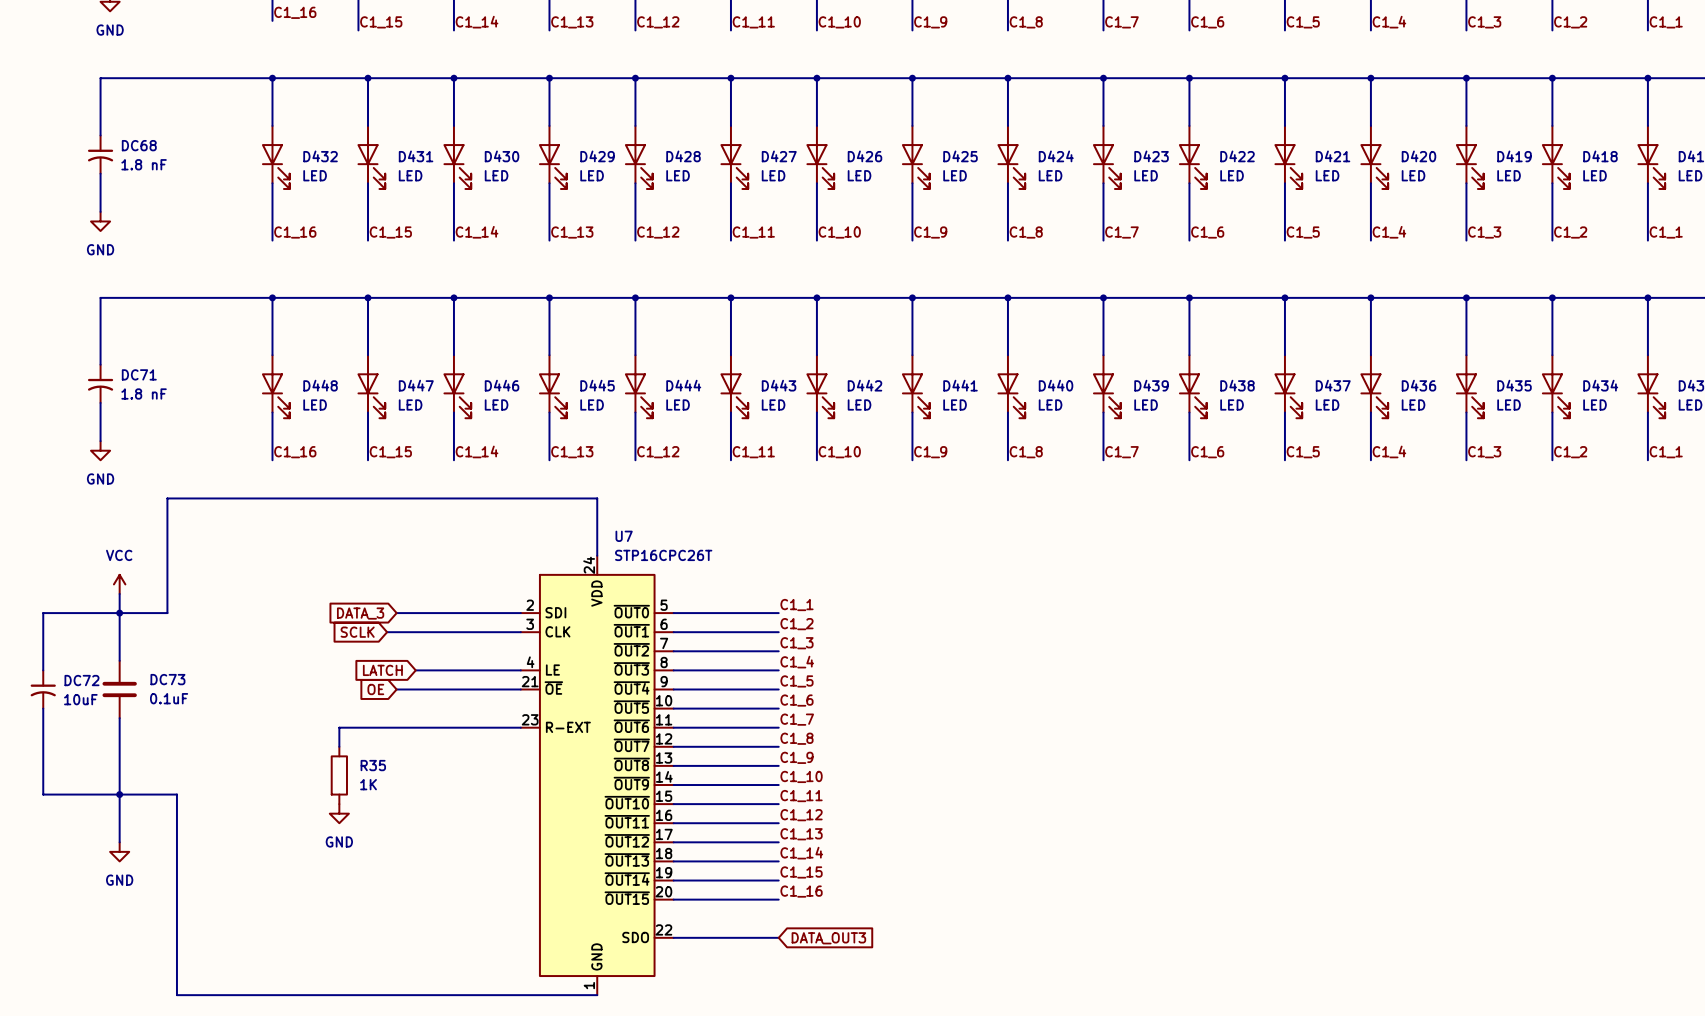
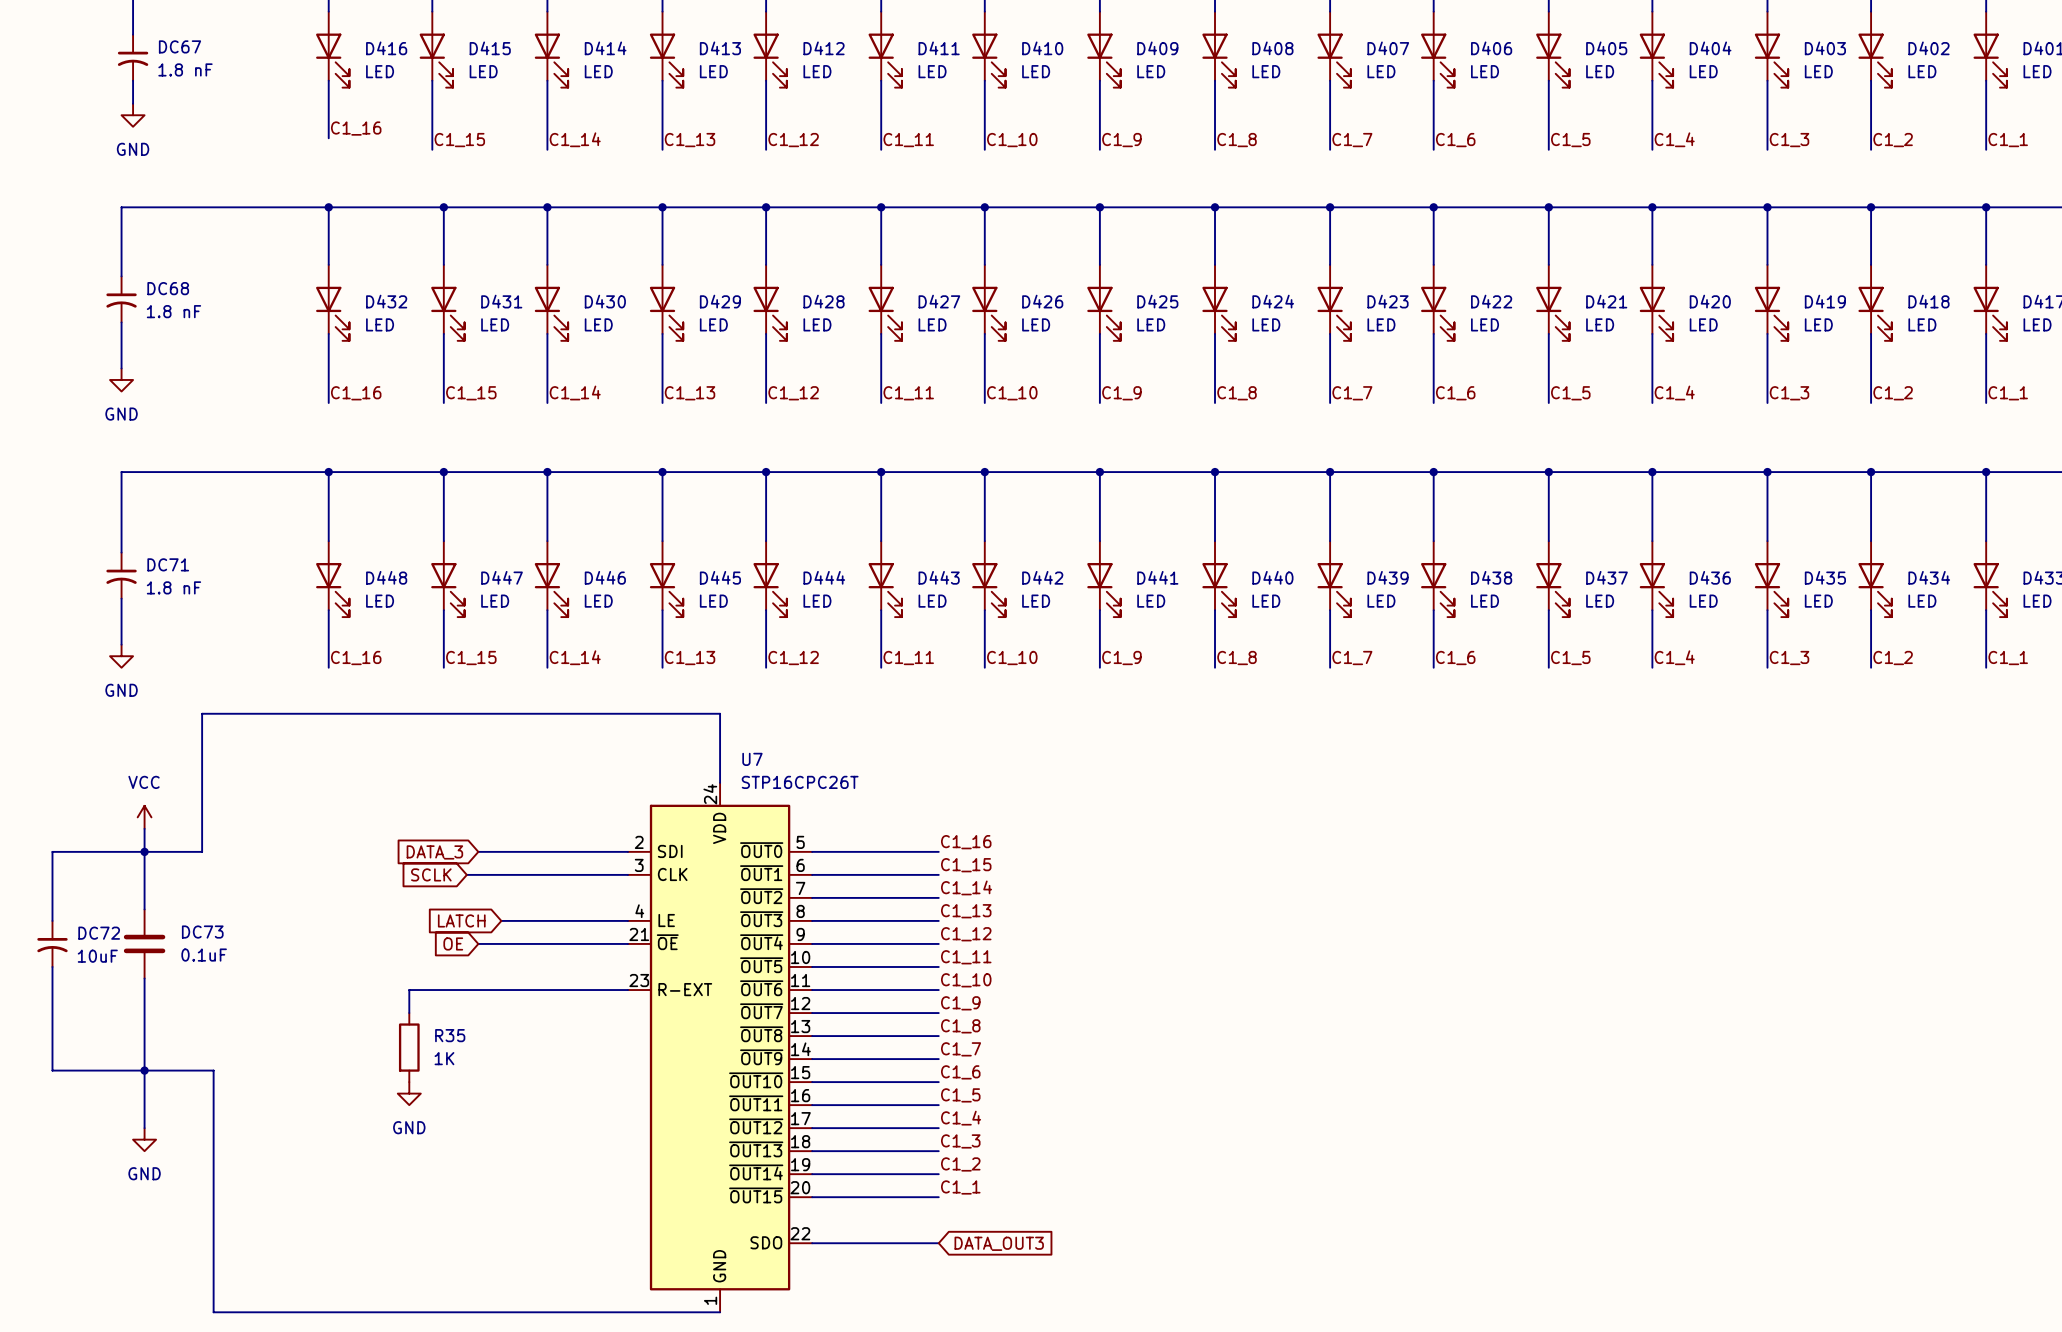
label: C1_1 (796, 605) -> C1_16 (966, 842)
label: C1_2 (796, 624) -> C1_15 (966, 865)
label: C1_3 (796, 643) -> C1_14 (966, 887)
label: C1_4 (797, 662) -> C1_13 (966, 911)
label: C1_5 (796, 681) -> C1_12 (966, 934)
label: C1_6 (796, 700) -> C1_11 (966, 957)
label: C1_7 (797, 719) -> C1_10 (966, 980)
label: C1_8 (796, 738) -> C1_9 (960, 1003)
label: C1_9 (796, 757) -> C1_8 (960, 1026)
label: C1_10 (801, 776) -> C1_7 (961, 1049)
label: C1_11 (801, 796) -> C1_6 (960, 1072)
label: C1_12 (801, 815) -> C1_5 (960, 1095)
label: C1_13 (801, 834) -> C1_4 (961, 1118)
label: C1_14 (801, 853) -> C1_3 (960, 1141)
label: C1_15 (801, 872) -> C1_2 (960, 1164)
label: C1_16 (801, 891) -> C1_1 (960, 1187)

